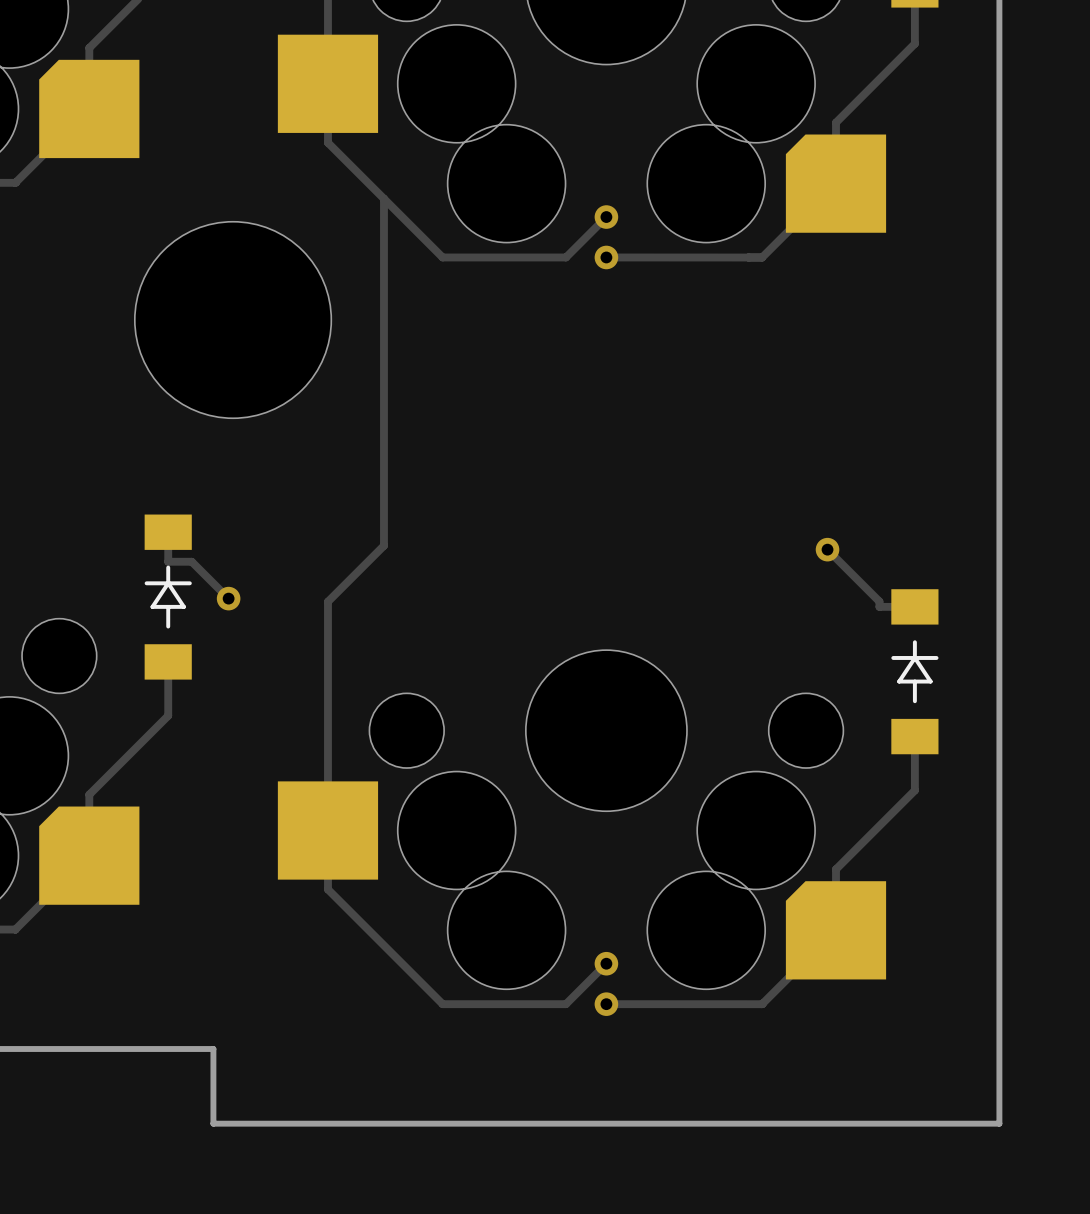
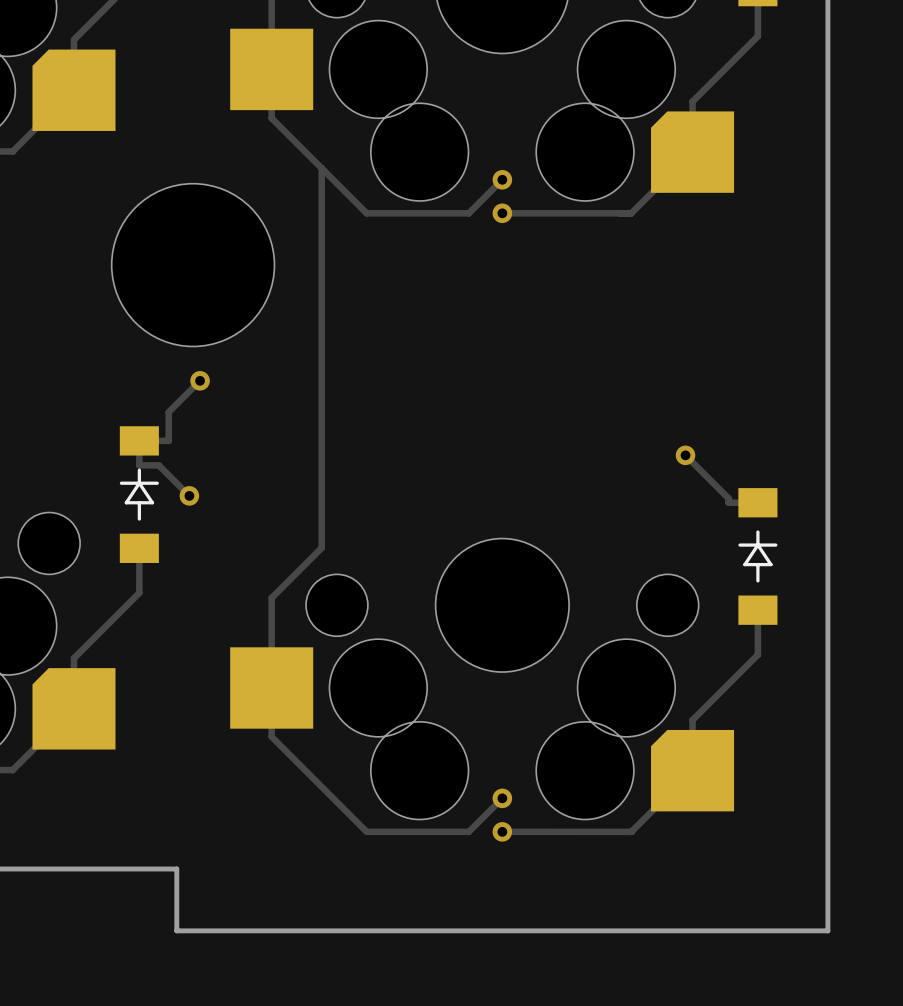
track: (383, 198) (383, 545) (327, 601) (327, 721) -> (321, 168) (321, 547) (271, 597)
track: none -> (200, 380) (168, 412) (168, 440) (139, 440)
via: none -> (200, 380)

